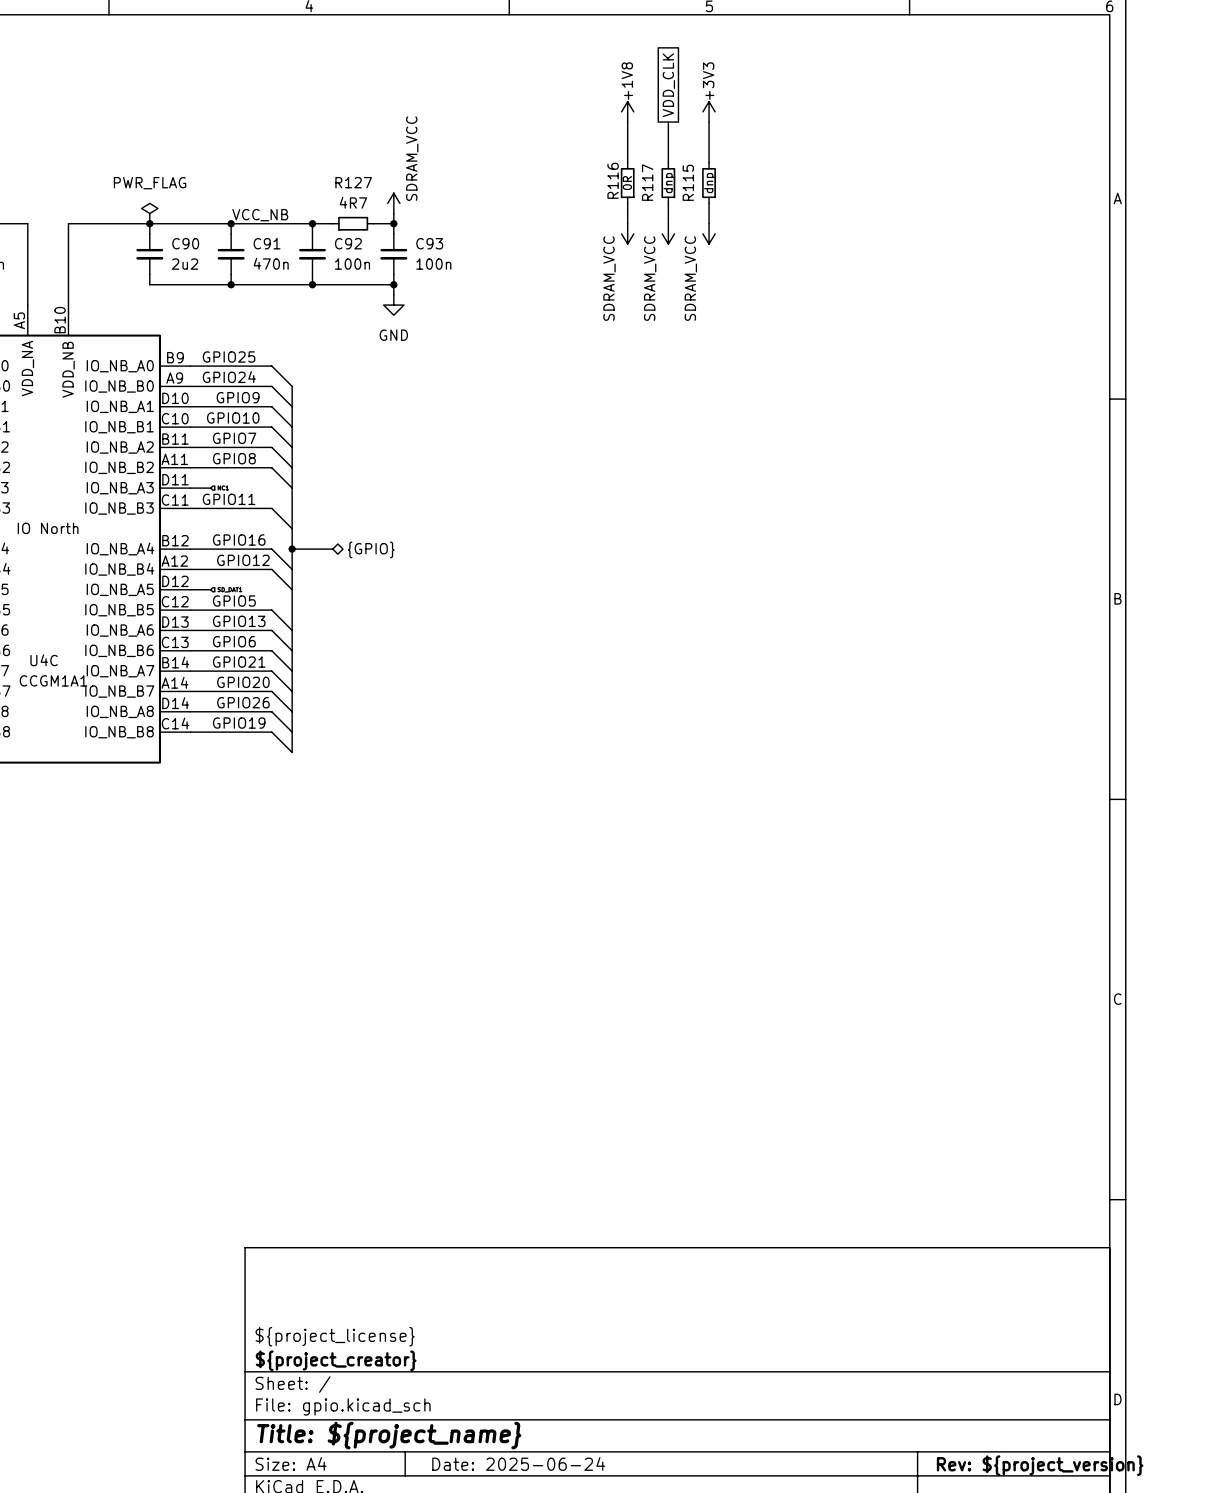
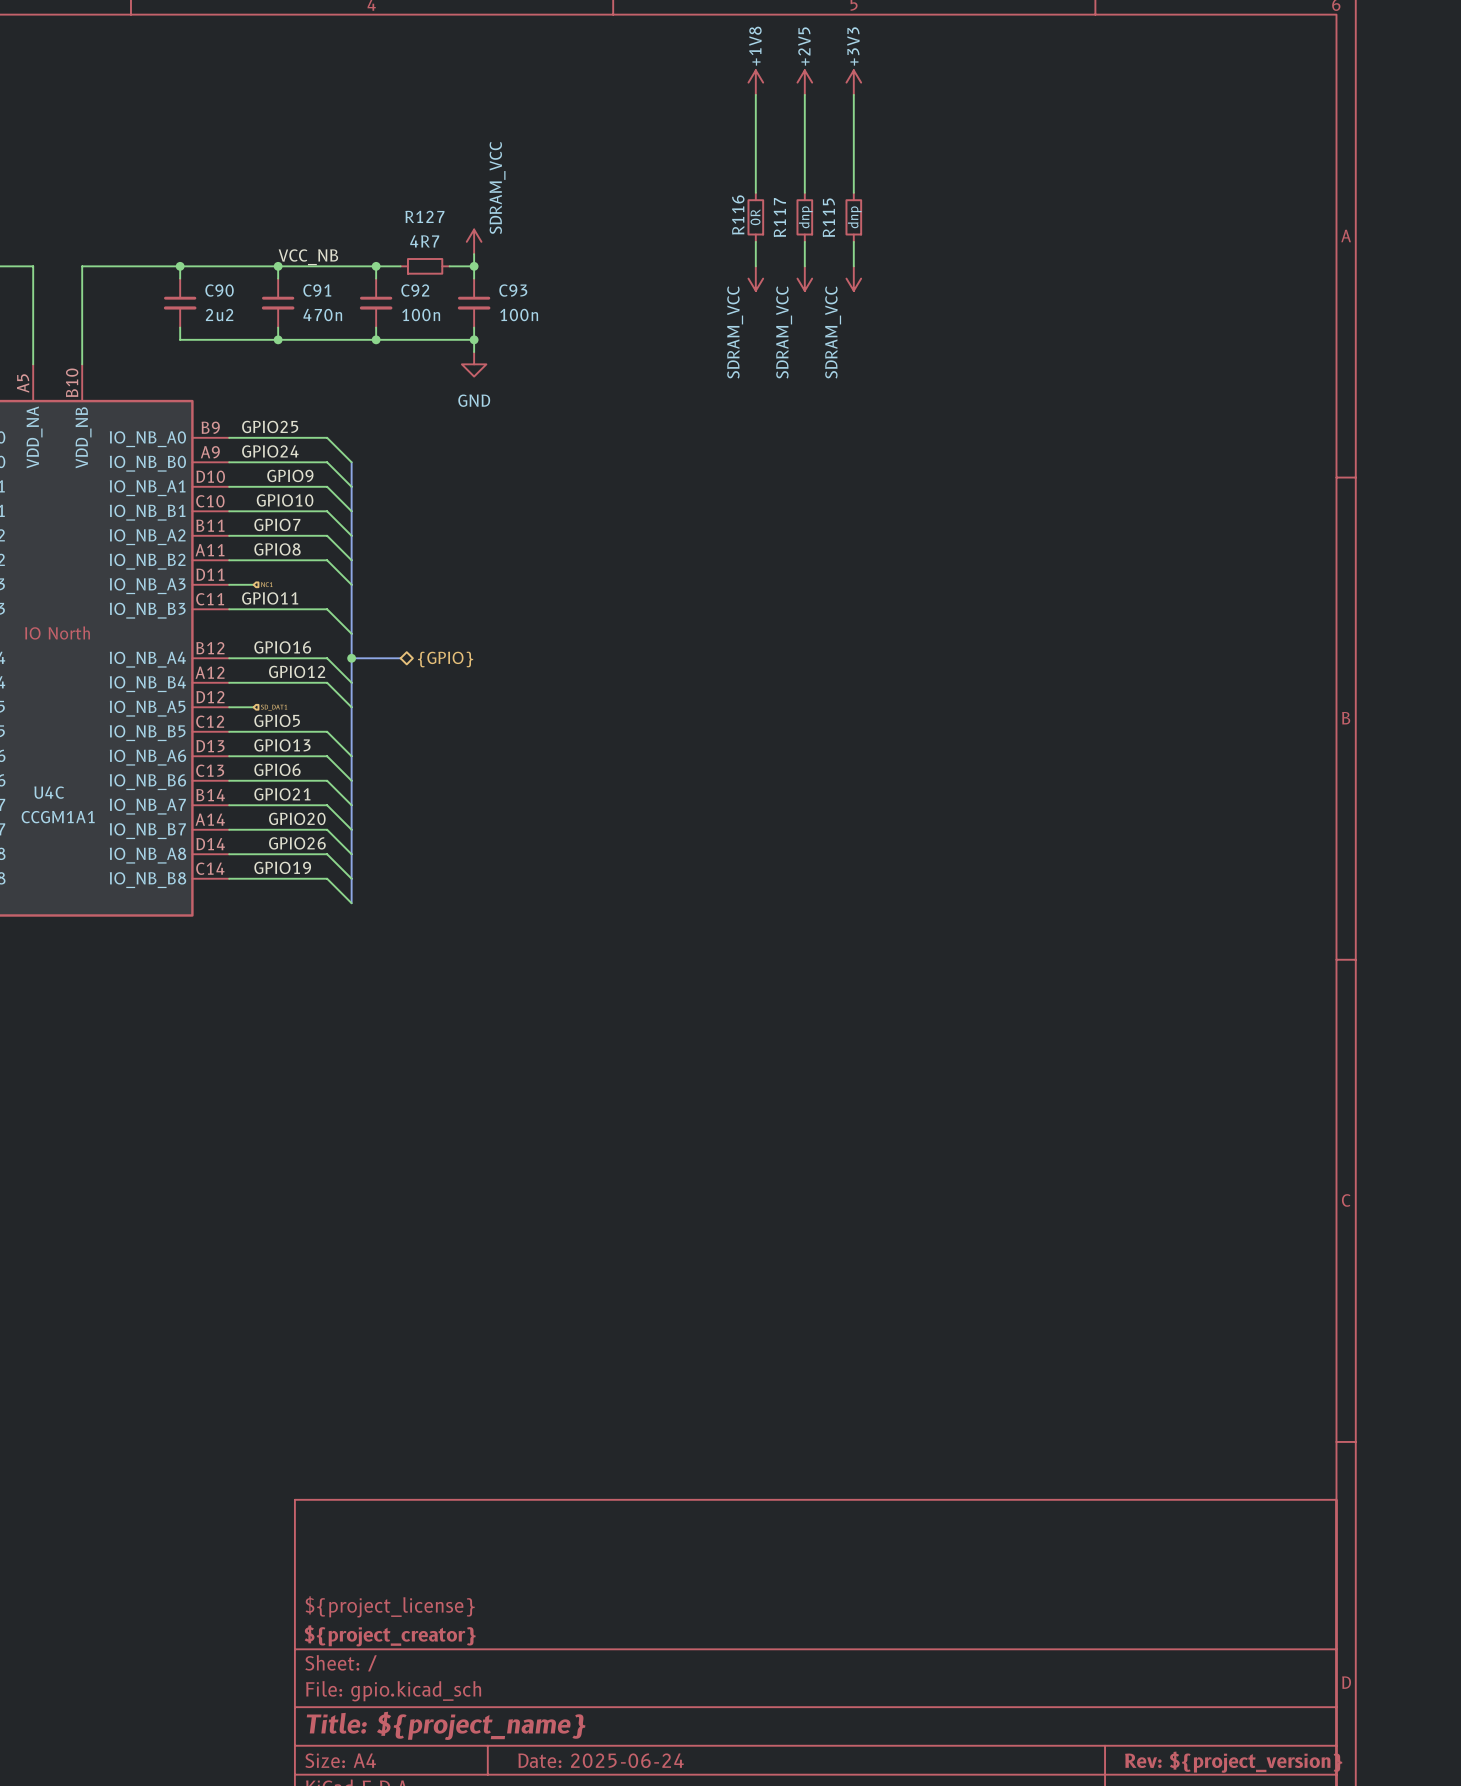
power symbol: none -> +2V5 (804, 82)
wire: none -> (804, 94) (804, 143)
global label: VDD_CLK (668, 85) -> none
power symbol position: +1V8 (627, 111) -> +1V8 (755, 82)
power symbol position: +3V3 (709, 111) -> +3V3 (853, 82)
power symbol: PWR_FLAG (149, 213) -> none

